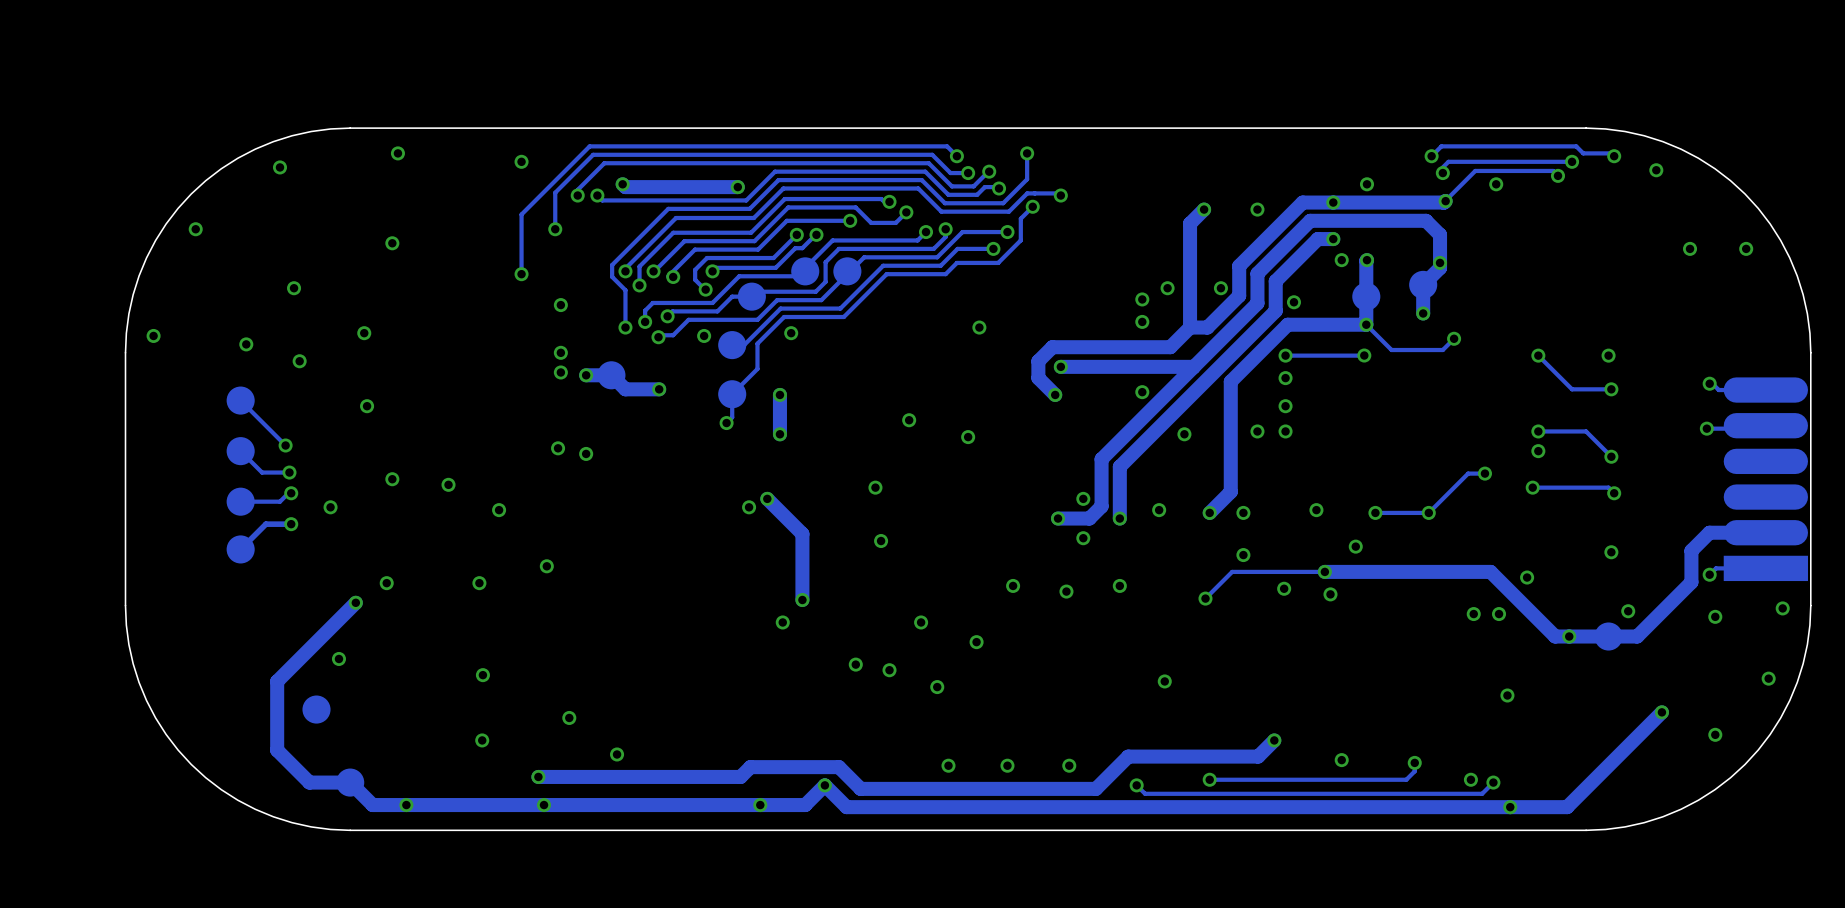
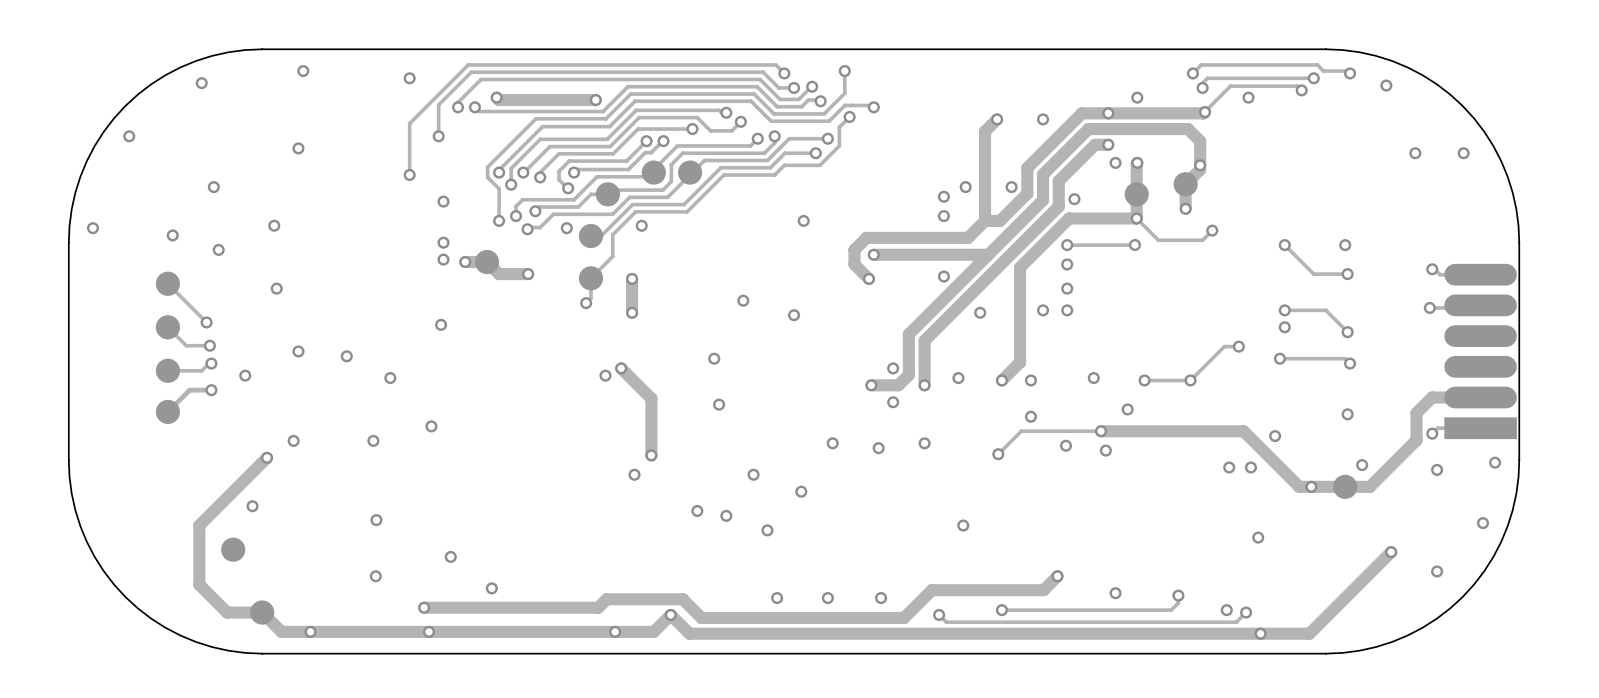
via: (586, 453) -> none

